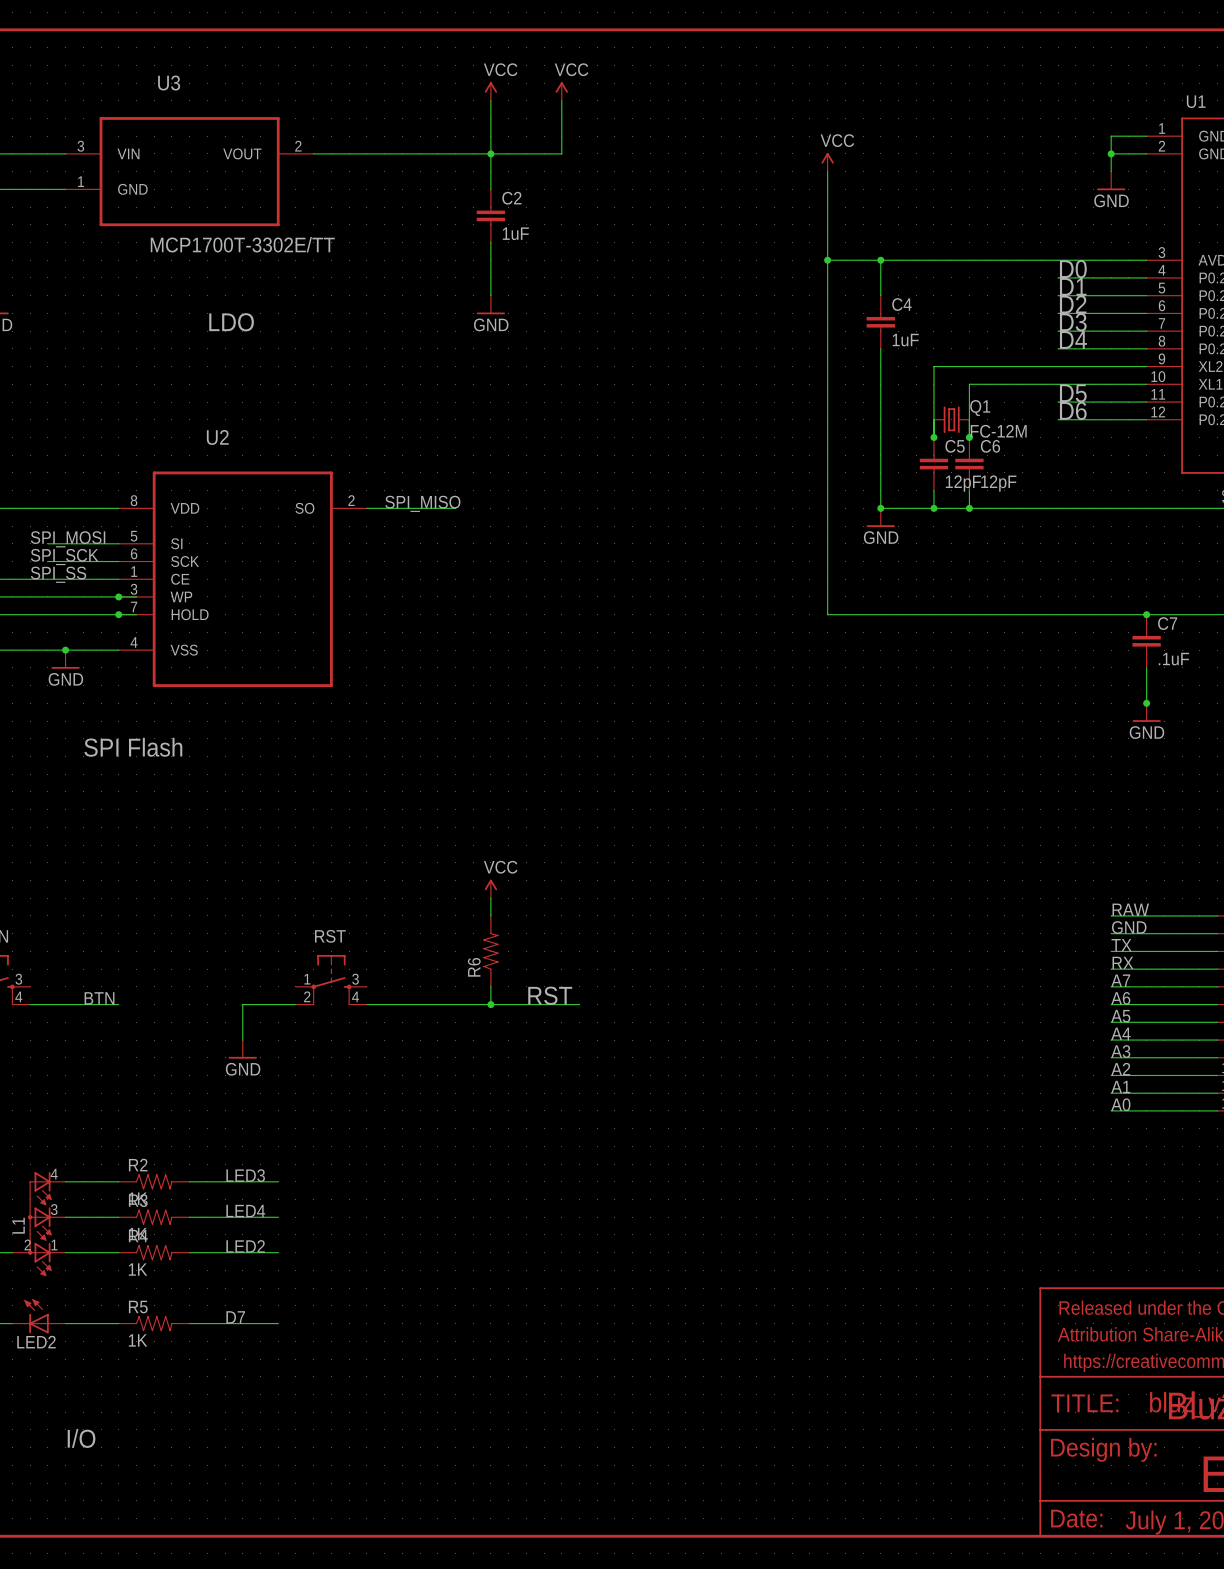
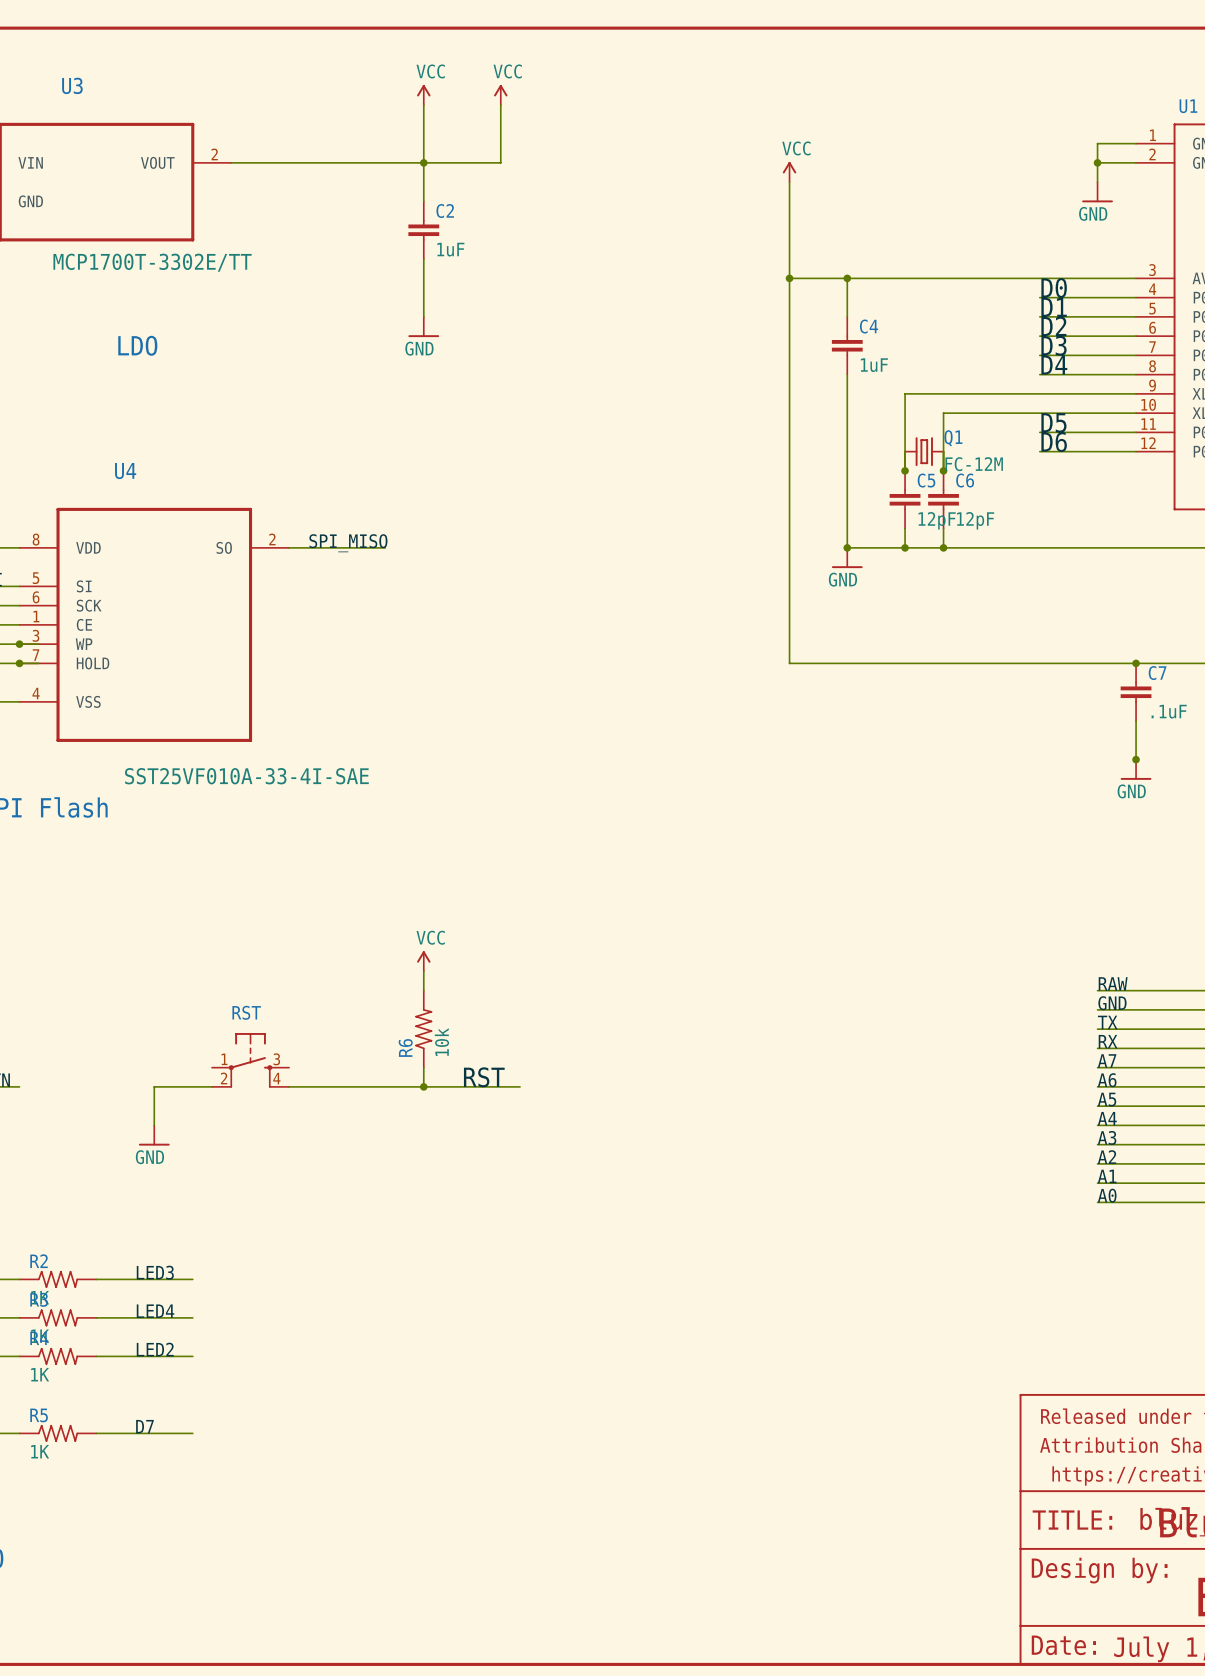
U2 name: U2 (217, 437) -> U4 (125, 471)
U2 value: none -> SST25VF010A-33-4I-SAE (246, 776)
R6 value: none -> 10k (441, 1042)

